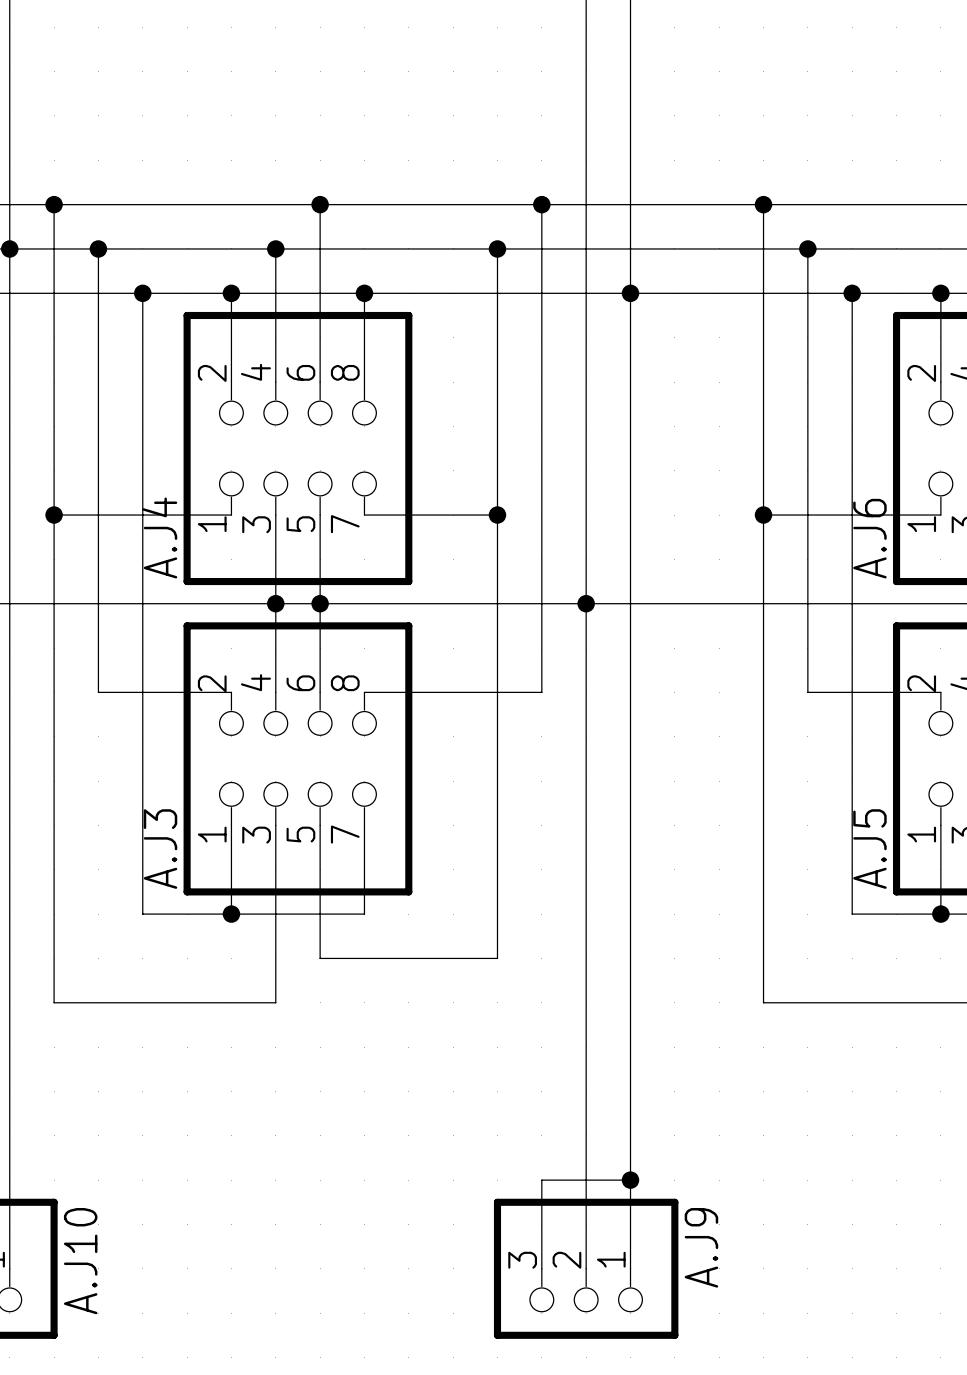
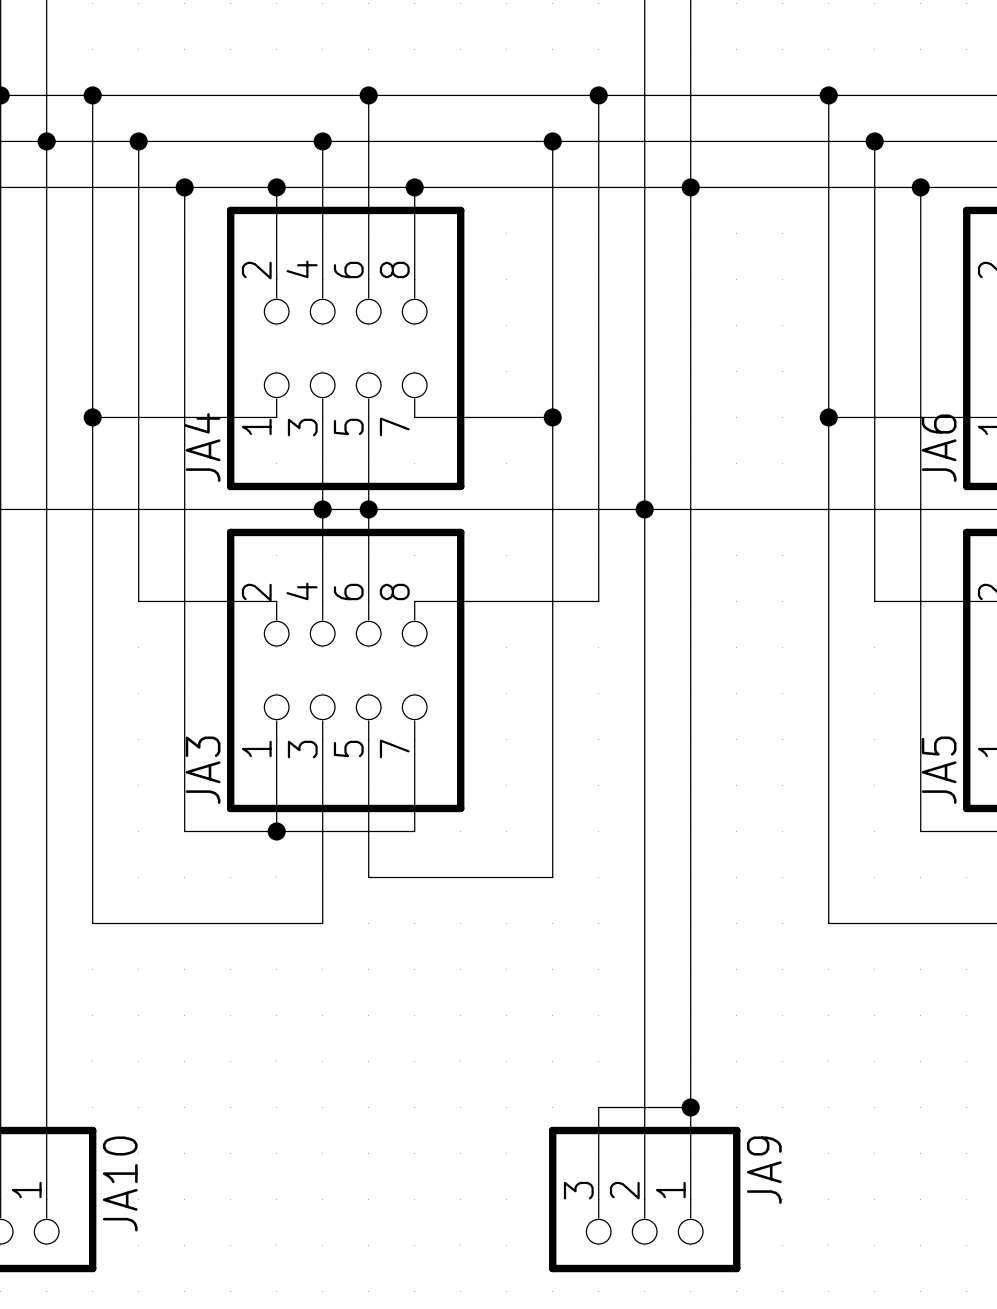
A.J4 name: A.J4 (159, 538) -> JA4 (202, 447)
A.J6 name: A.J6 (869, 538) -> JA6 (939, 448)
A.J3 name: A.J3 (160, 849) -> JA3 (203, 770)
A.J5 name: A.J5 (869, 849) -> JA5 (939, 770)
A.J9 name: A.J9 (701, 1247) -> JA9 (764, 1170)
A.J10 name: A.J10 (80, 1261) -> JA10 (120, 1183)

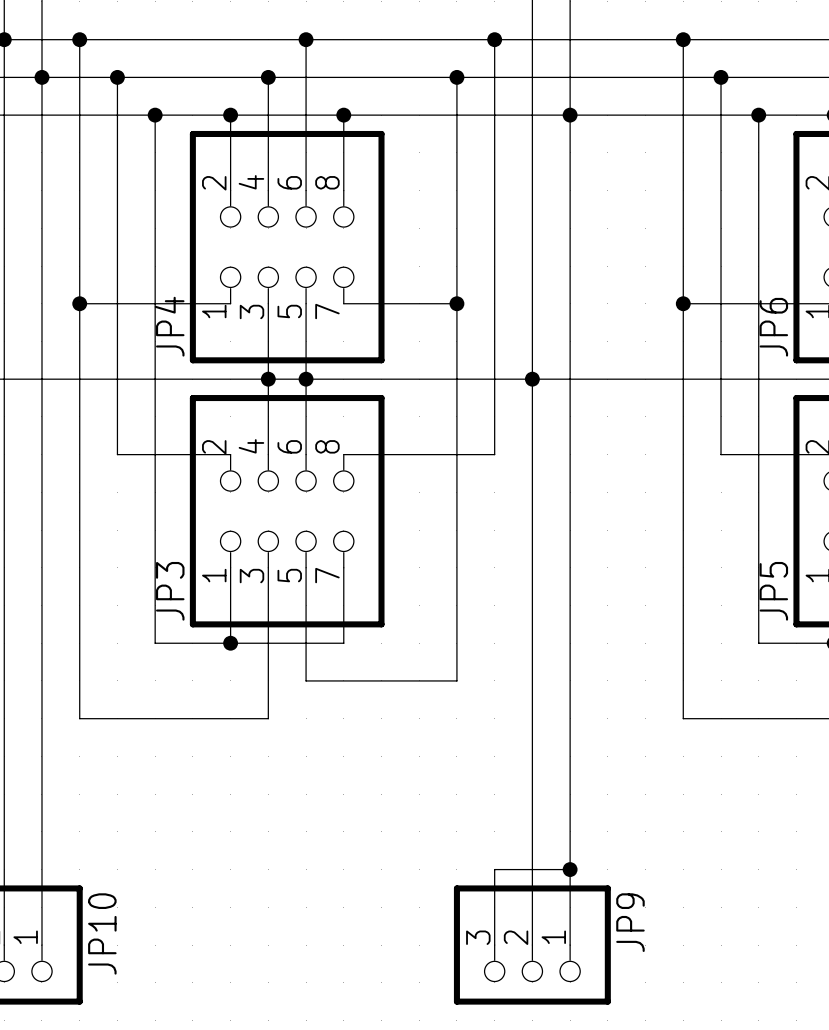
JA4 name: JA4 (202, 447) -> JP4 (169, 326)
JA6 name: JA6 (939, 448) -> JP6 (773, 327)
JA3 name: JA3 (203, 770) -> JP3 (170, 591)
JA5 name: JA5 (939, 770) -> JP5 (773, 591)
JA9 name: JA9 (764, 1170) -> JP9 (630, 922)
JA10 name: JA10 (120, 1183) -> JP10 (102, 933)

